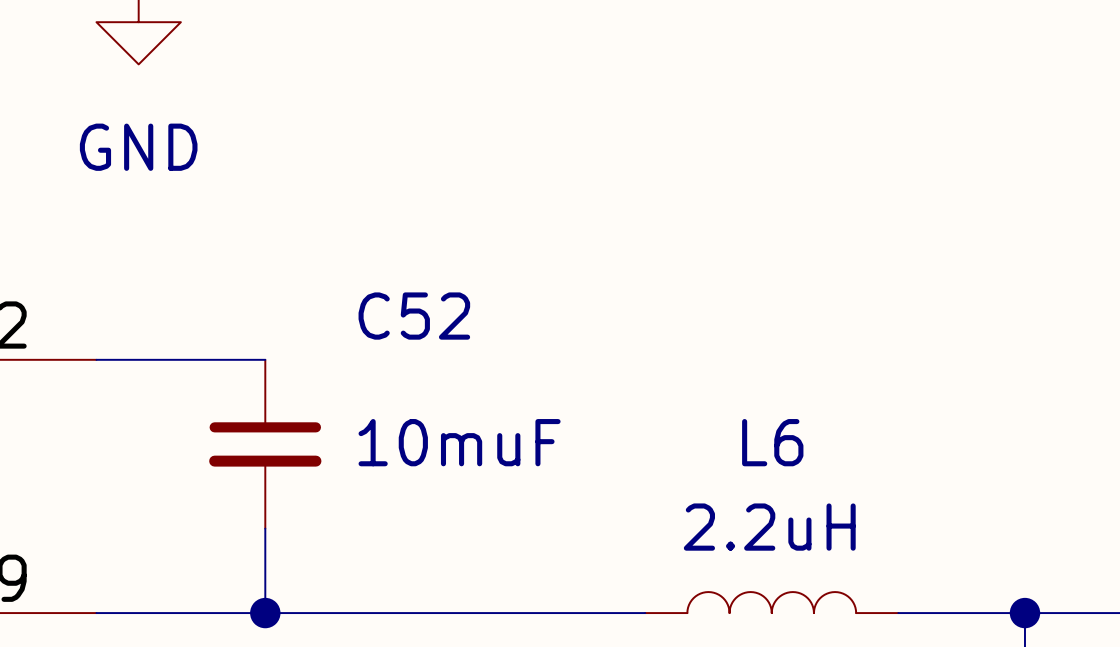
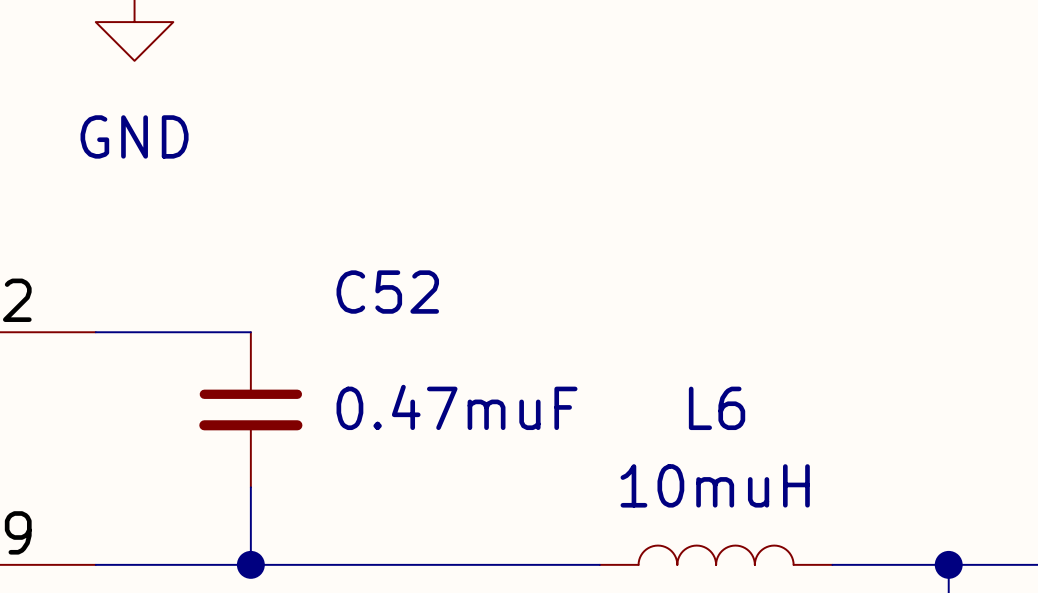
C52 value: 10muF (459, 442) -> 0.47muF (457, 407)
L6 value: 2.2uH (769, 527) -> 10muH (715, 485)

